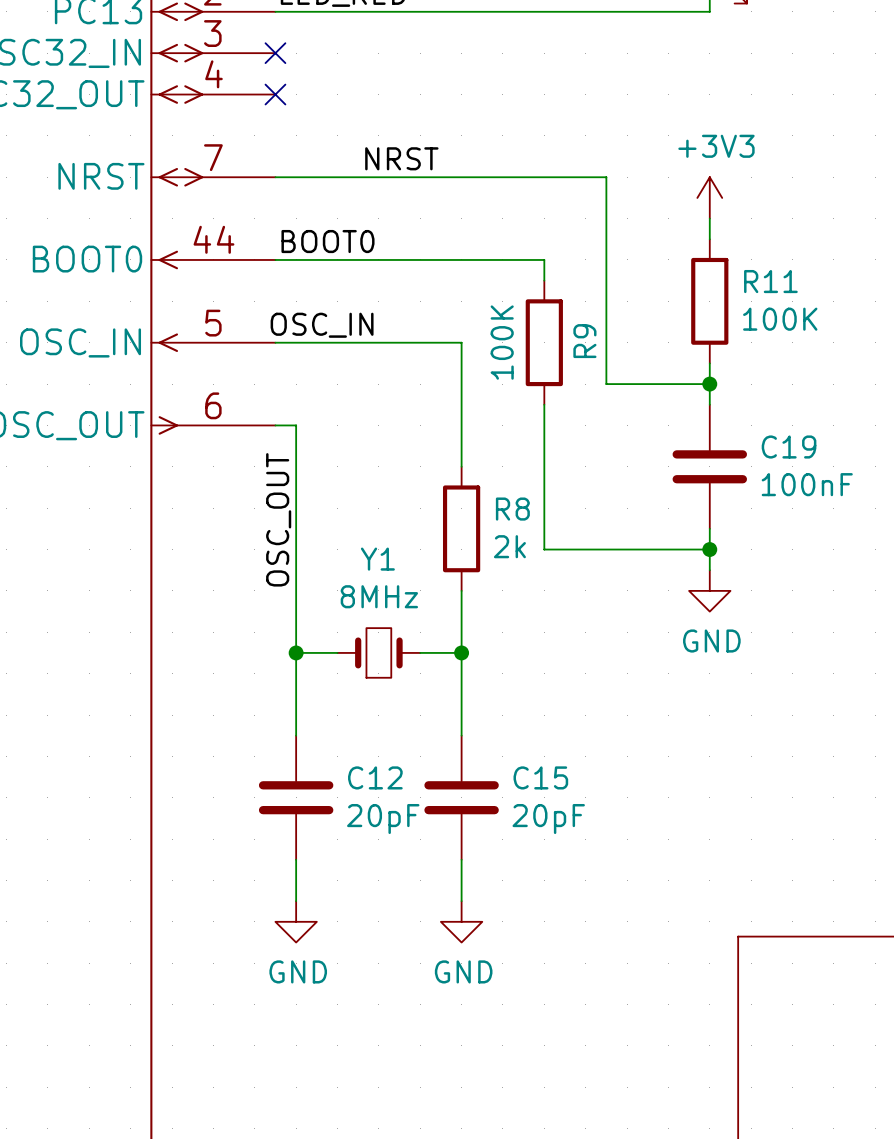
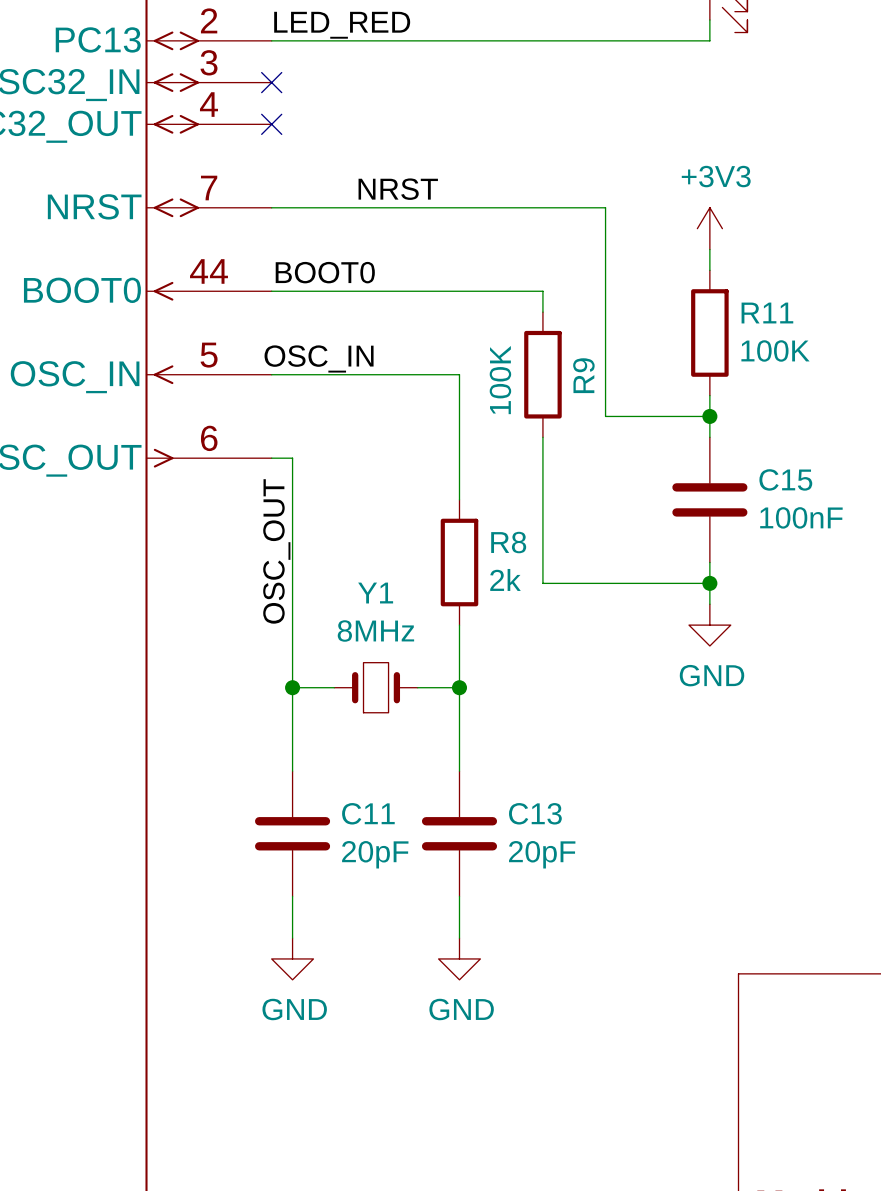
C19 name: C19 (789, 447) -> C15 (785, 479)
C12 name: C12 (375, 777) -> C11 (368, 813)
C15 name: C15 (540, 777) -> C13 (535, 813)

